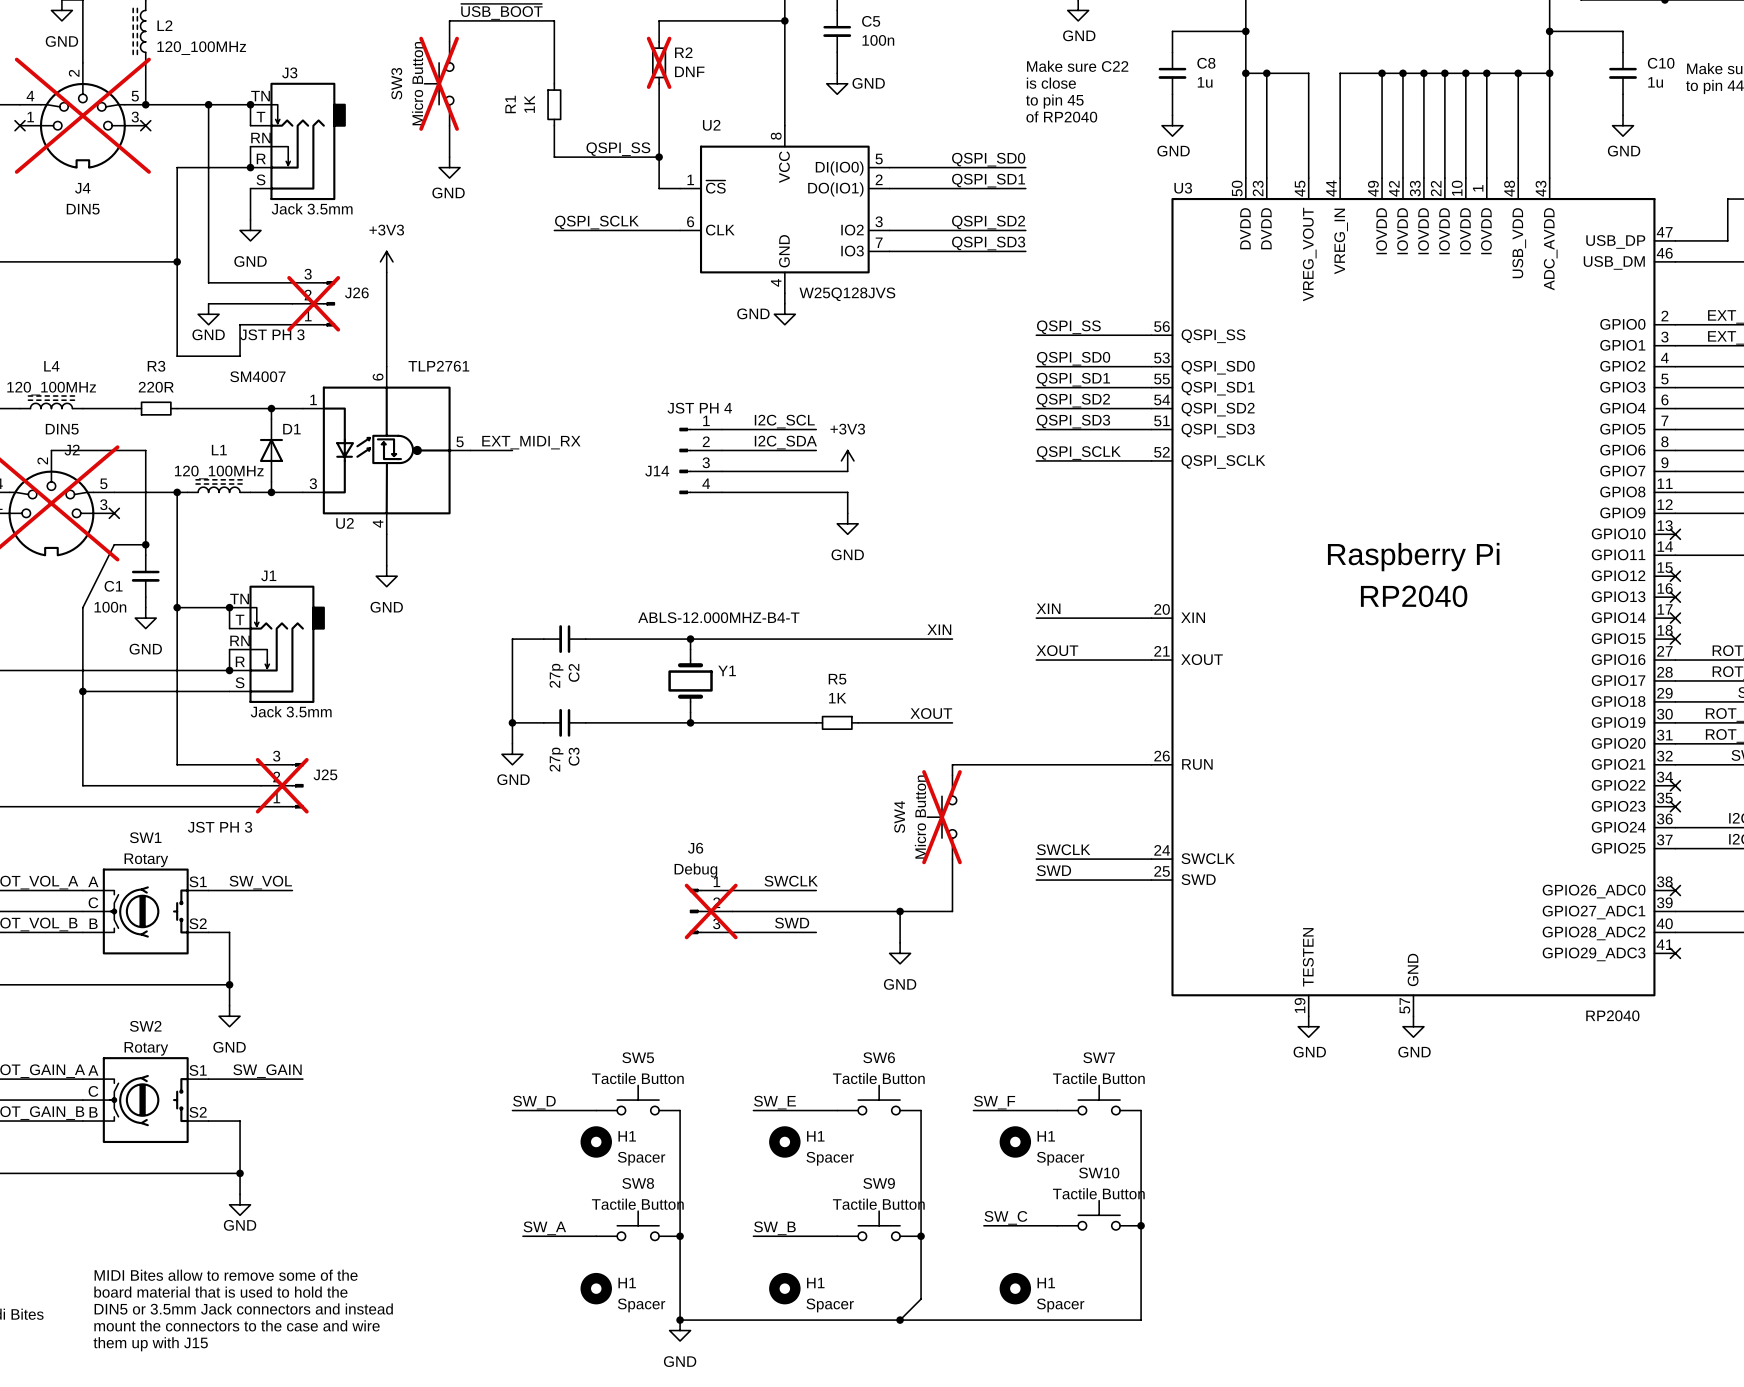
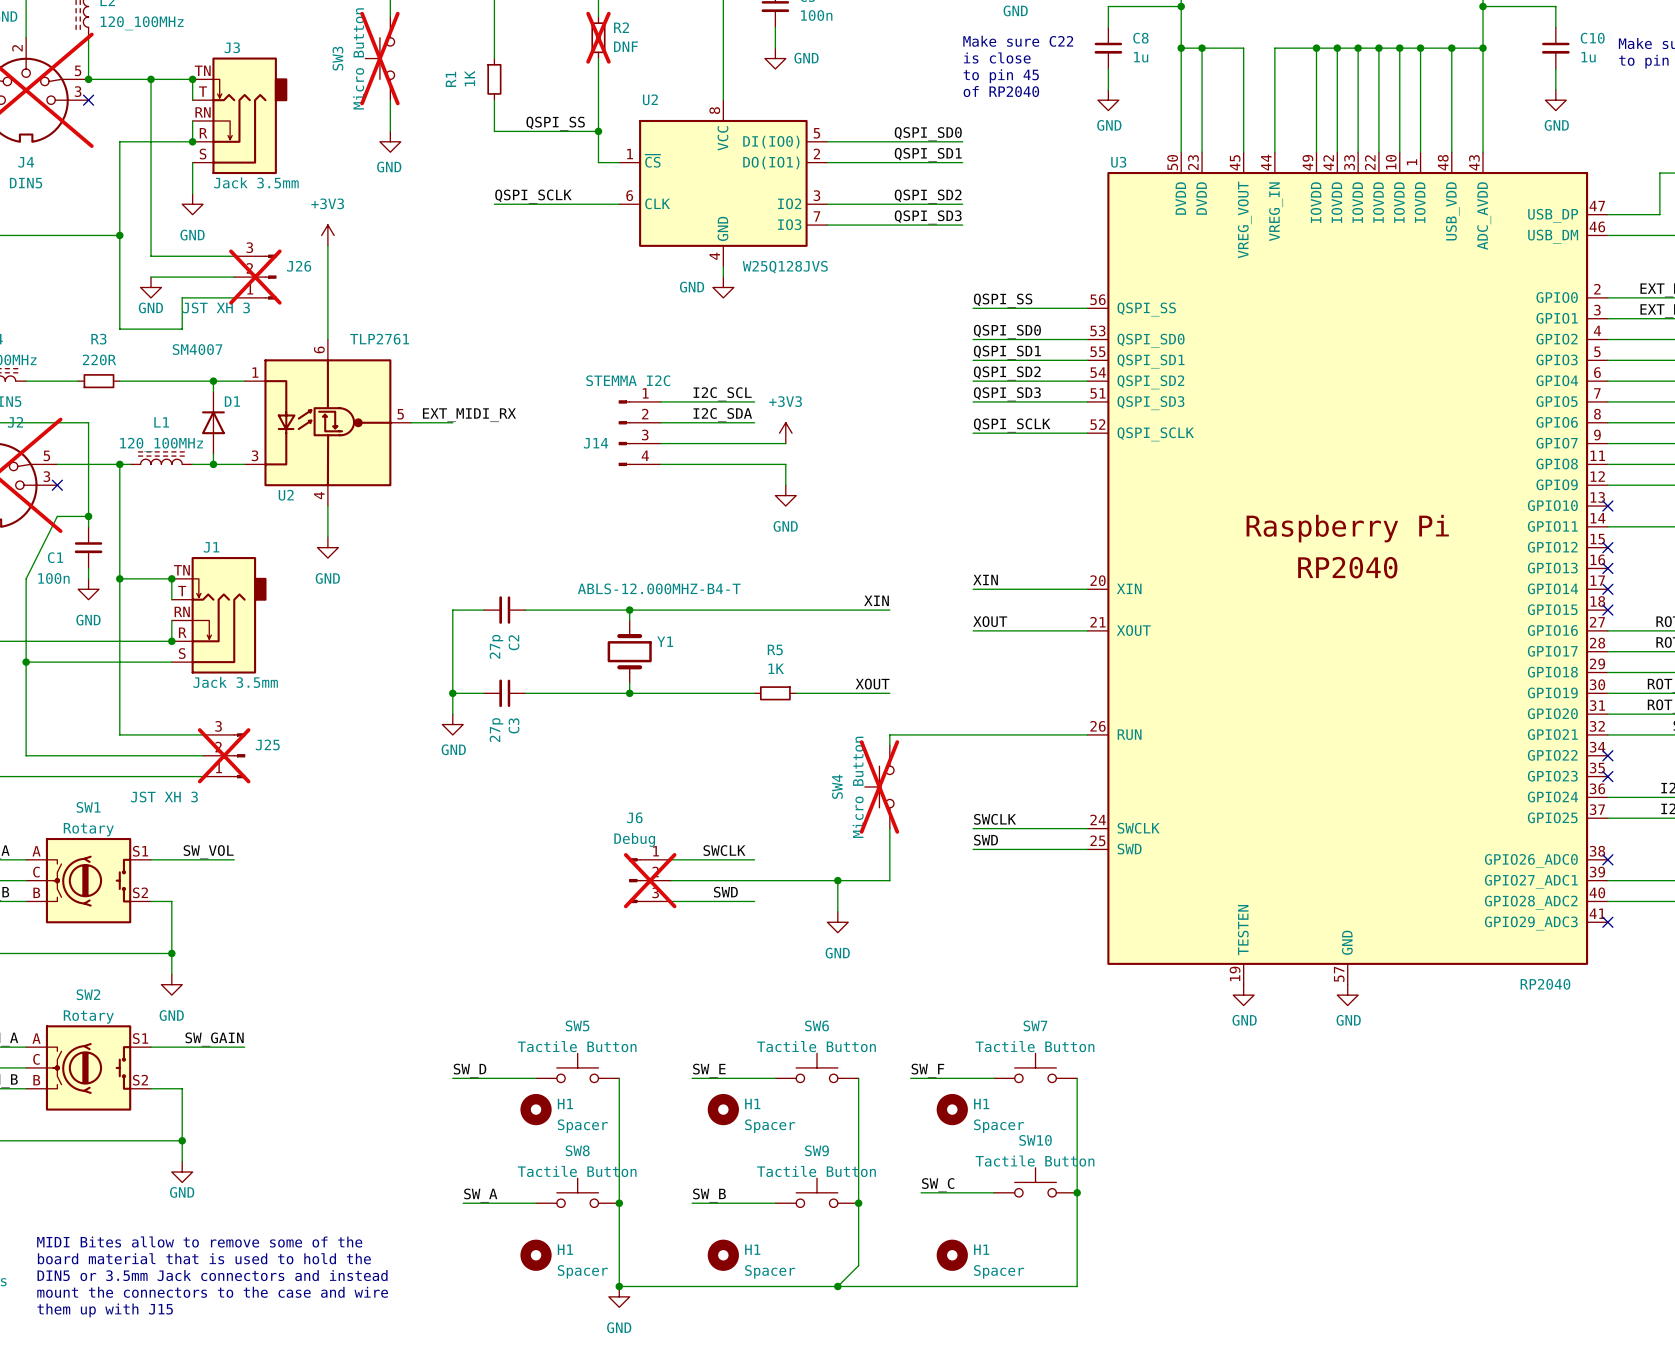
J26 value: JST PH 3 (272, 334) -> JST XH 3 (216, 307)
J14 value: JST PH 4 (699, 408) -> STEMMA I2C (628, 380)
J25 value: JST PH 3 (220, 827) -> JST XH 3 (164, 797)

